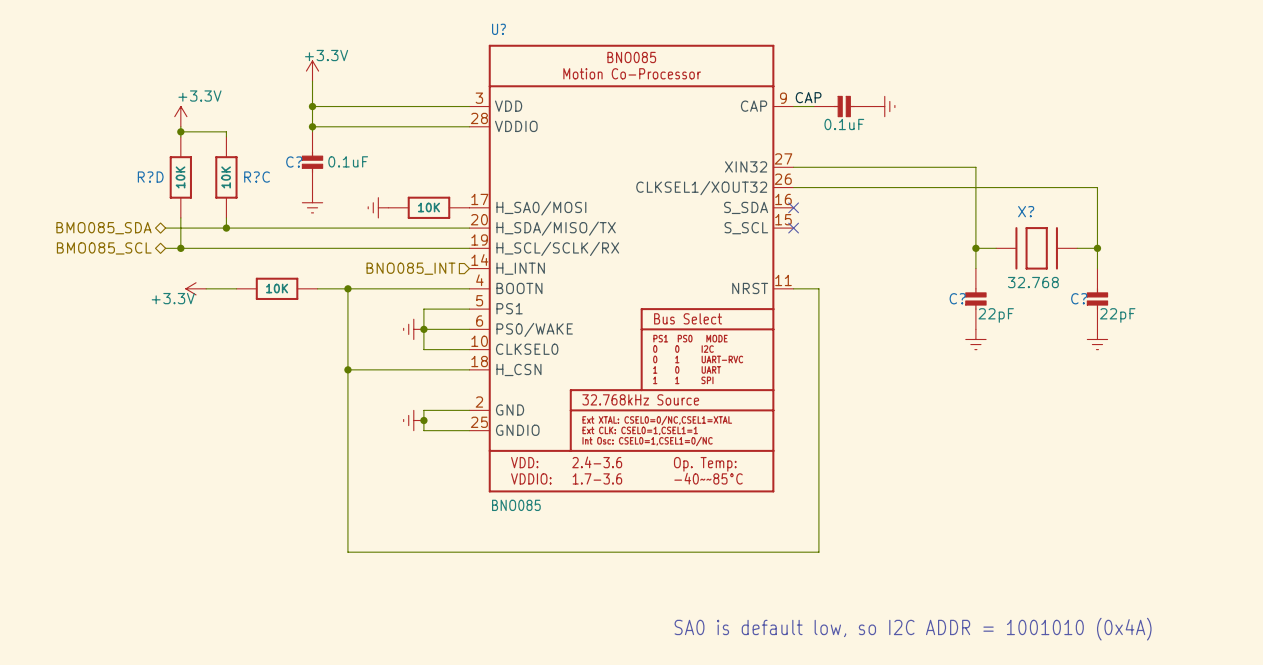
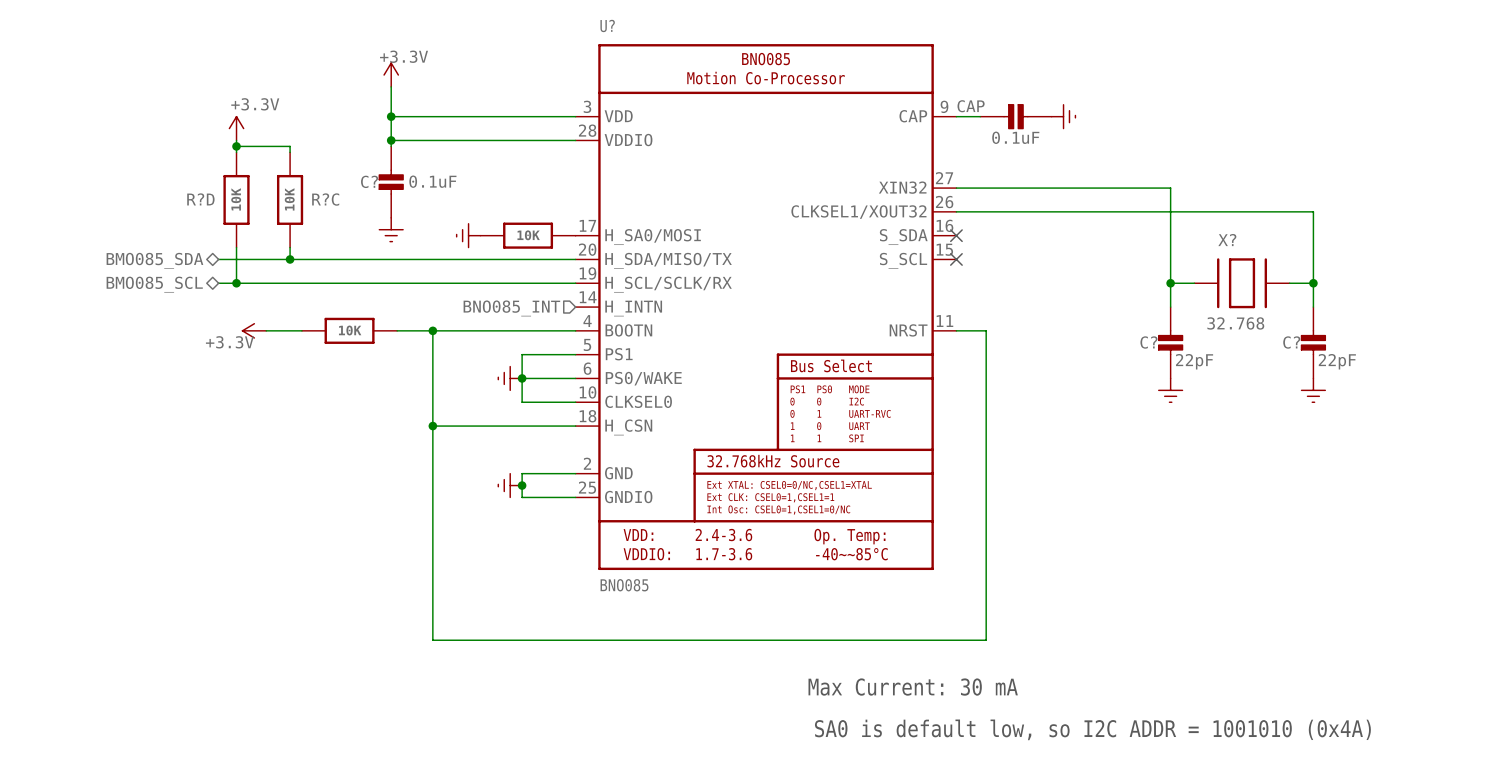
text: none -> Max Current: 30 mA (913, 687)

